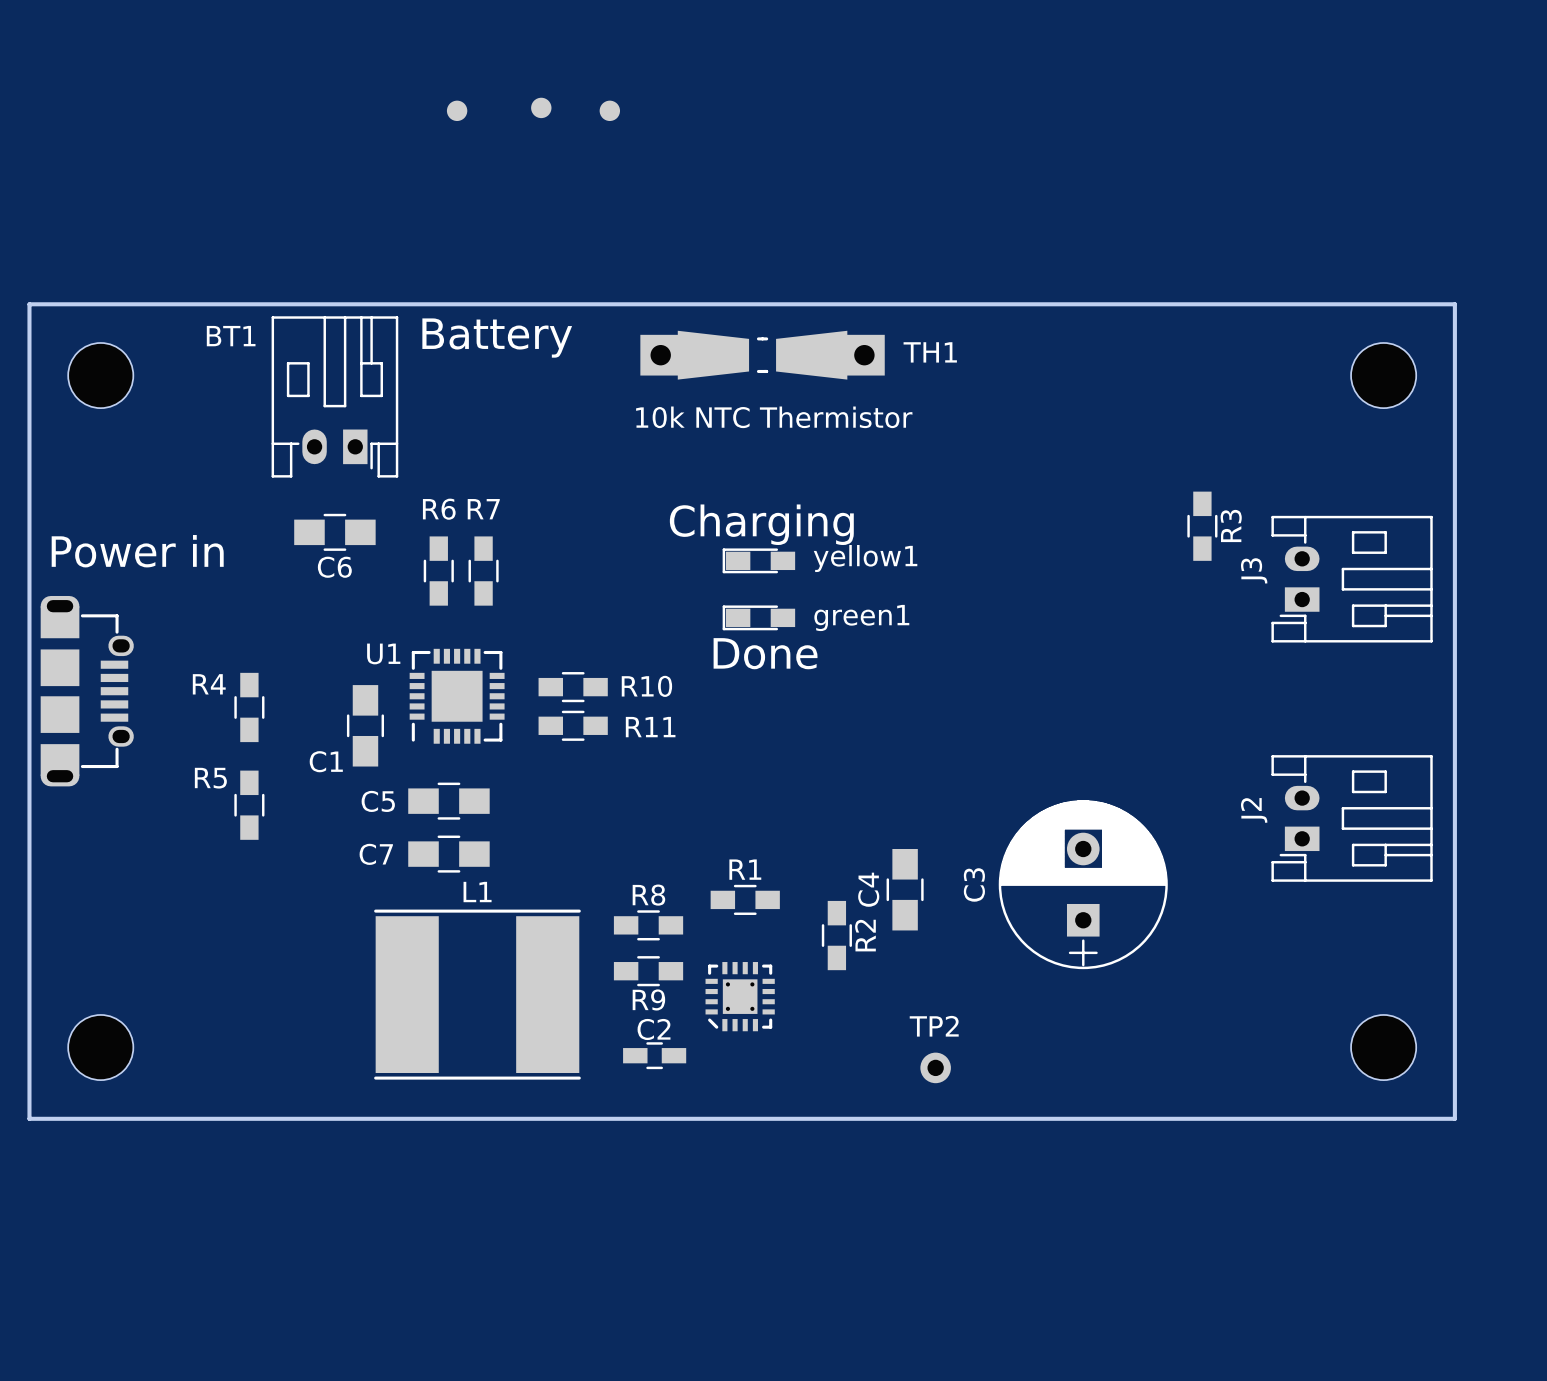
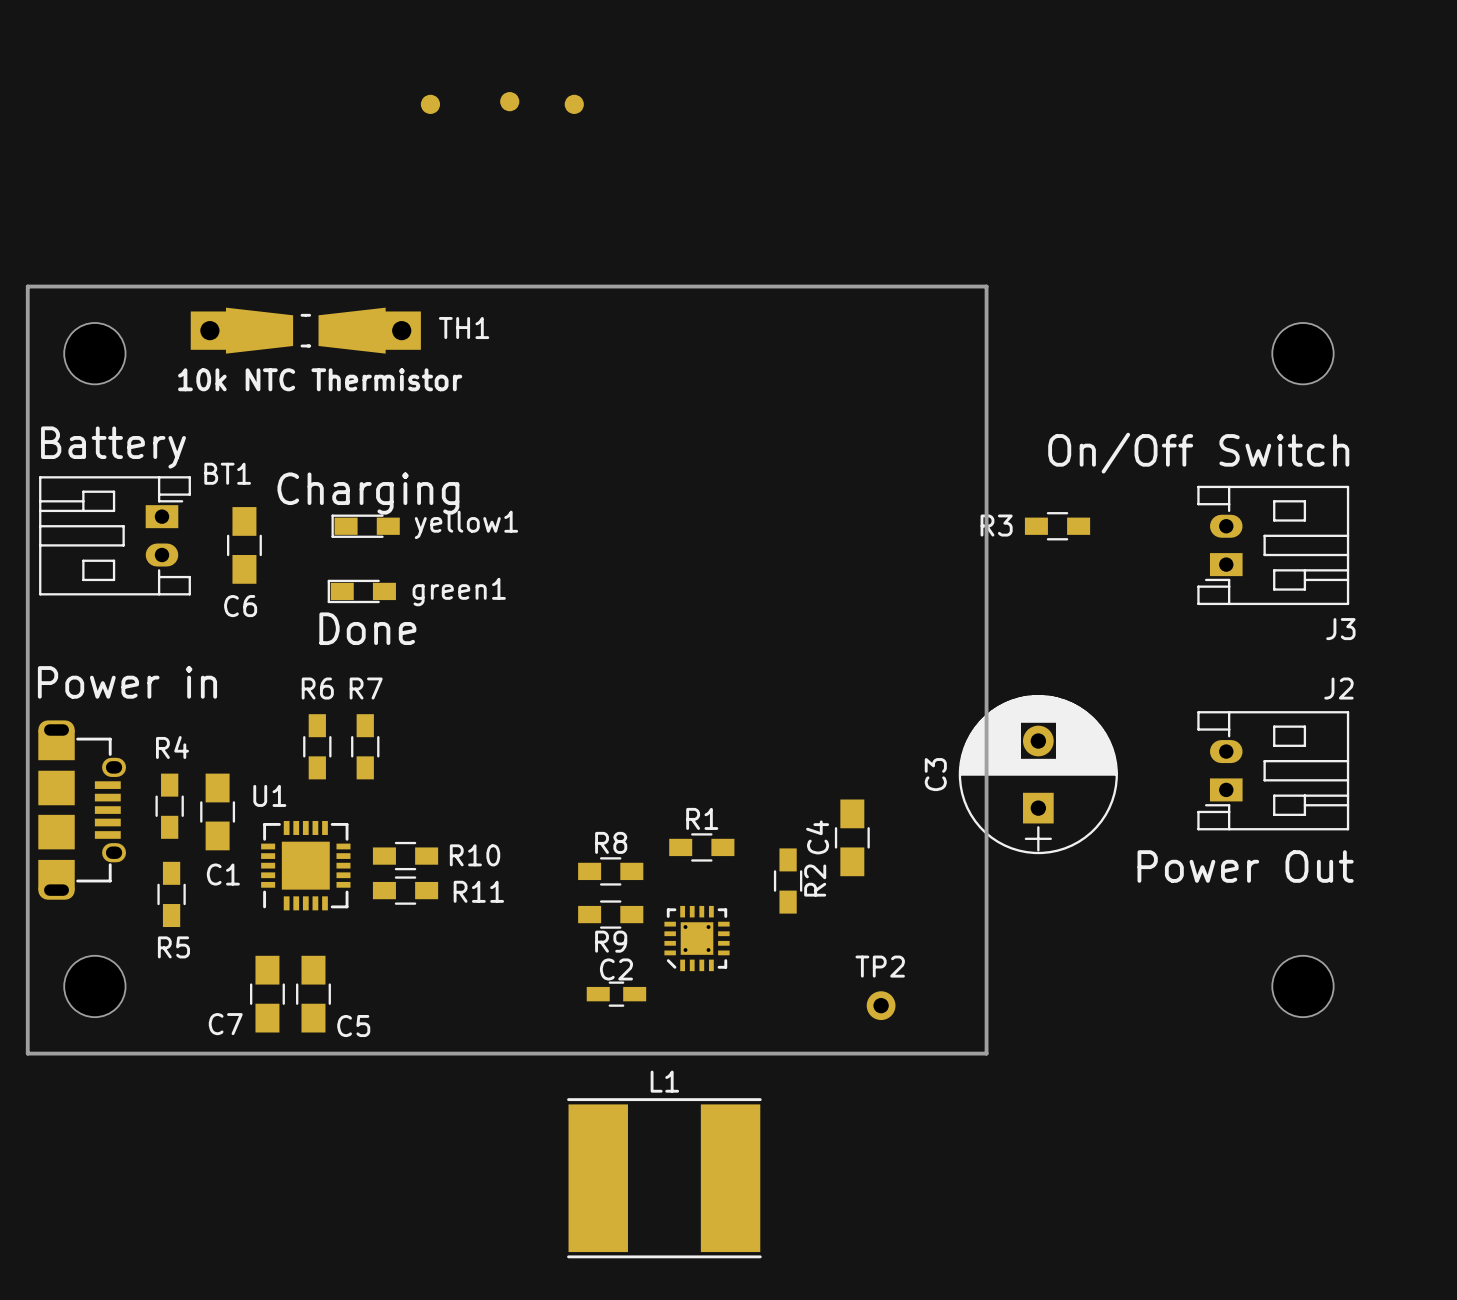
board edge: (1047, 304) (1454, 304) (1454, 1118) (1047, 1118) -> (986, 286) (986, 1053)
BT1 name position: BT1 (231, 336) -> BT1 (227, 473)
text position: Battery (497, 338) -> Battery (113, 447)
TH1 position: (762, 355) -> (305, 330)
BT1 rotation: 0° (334, 396) -> 90° counterclockwise (115, 535)
BT1 position: (334, 396) -> (115, 535)
text position: 10k NTC Thermistor (774, 417) -> 10k NTC Thermistor (320, 379)
text: none -> On/Off Switch (1198, 453)
text position: Charging (761, 524) -> Charging (368, 493)
R3 name position: R3 (1231, 525) -> R3 (996, 525)
R3 rotation: 0° (1202, 526) -> 90° clockwise (1057, 526)
R3 position: (1202, 526) -> (1057, 526)
C6 rotation: 0° (334, 532) -> 90° clockwise (244, 545)
C6 position: (334, 532) -> (244, 545)
text position: Power in (137, 551) -> Power in (127, 682)
yellow1 position: (758, 560) -> (365, 526)
J3 name rotation: 0° (1254, 570) -> 90° clockwise (1340, 629)
J3 name position: J3 (1254, 570) -> J3 (1340, 629)
R6 position: (438, 571) -> (317, 746)
R7 position: (483, 571) -> (365, 746)
green1 position: (758, 617) -> (361, 591)
U1 name position: U1 (383, 653) -> U1 (269, 795)
text position: Done (765, 653) -> Done (367, 628)
R4 name position: R4 (209, 684) -> R4 (172, 747)
R10 position: (573, 687) -> (405, 856)
part position: (87, 691) -> (82, 810)
U1 position: (457, 696) -> (305, 865)
R4 position: (249, 707) -> (169, 806)
C1 position: (365, 725) -> (217, 811)
R11 position: (573, 725) -> (405, 890)
C1 name position: C1 (326, 761) -> C1 (223, 874)
R5 name position: R5 (210, 778) -> R5 (173, 947)
C5 name position: C5 (378, 801) -> C5 (353, 1026)
C5 rotation: 0° (448, 801) -> 90° clockwise (313, 994)
C5 position: (448, 801) -> (313, 994)
R5 position: (249, 805) -> (171, 894)
J2 name rotation: 0° (1254, 810) -> 90° clockwise (1338, 688)
J2 name position: J2 (1254, 810) -> J2 (1338, 688)
C7 name position: C7 (376, 854) -> C7 (225, 1024)
C7 rotation: 0° (448, 854) -> 90° clockwise (267, 994)
C7 position: (448, 854) -> (267, 994)
C3 position: (1083, 884) -> (1038, 774)
text: none -> Power Out (1245, 866)
L1 position: (477, 994) -> (664, 1178)

